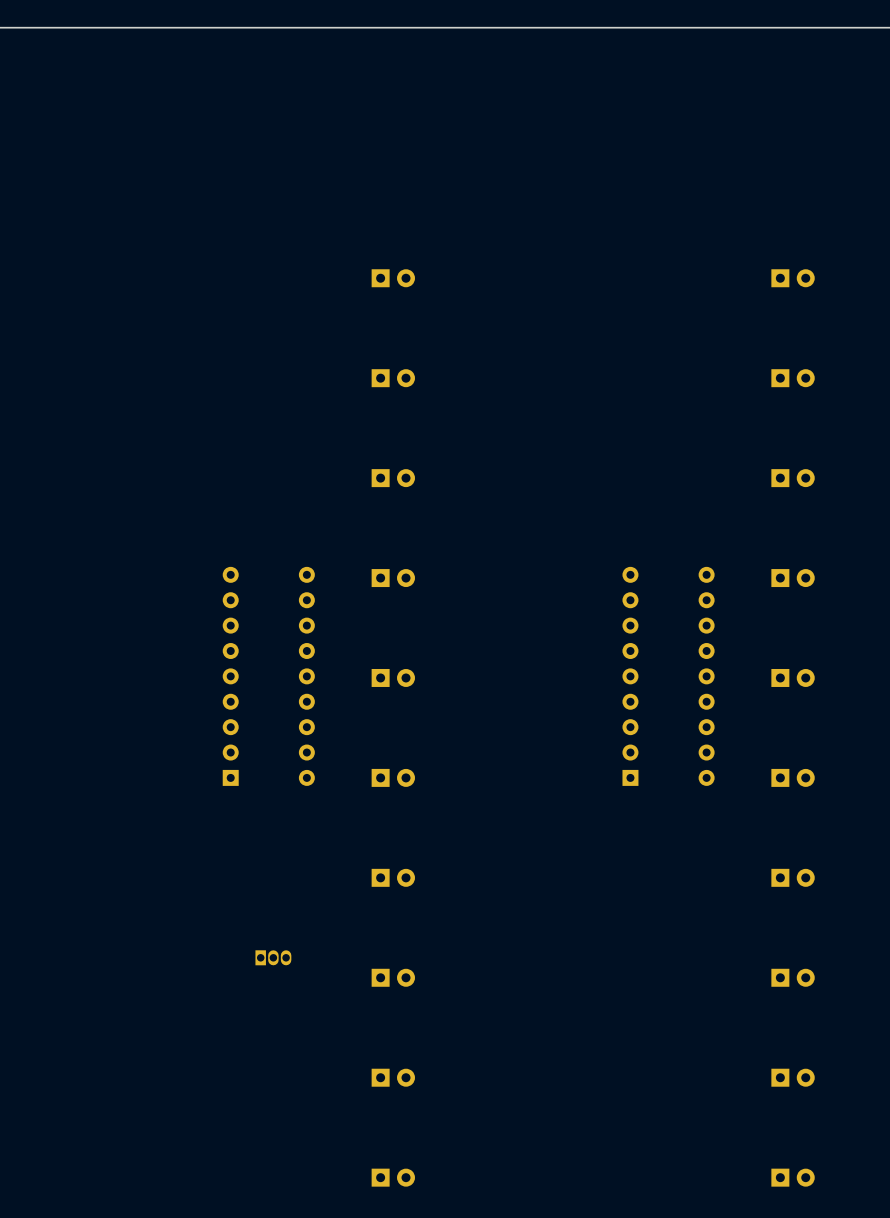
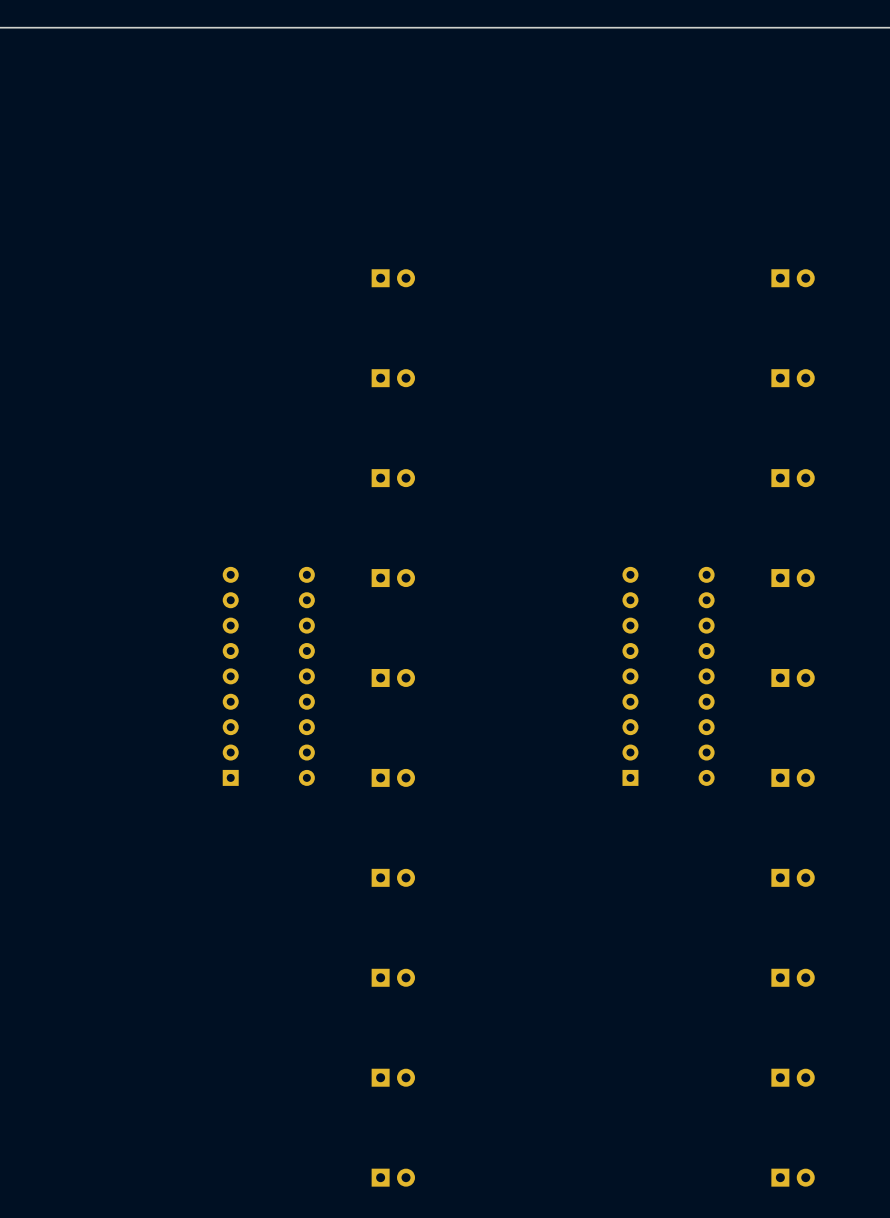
part: (273, 957) -> none

